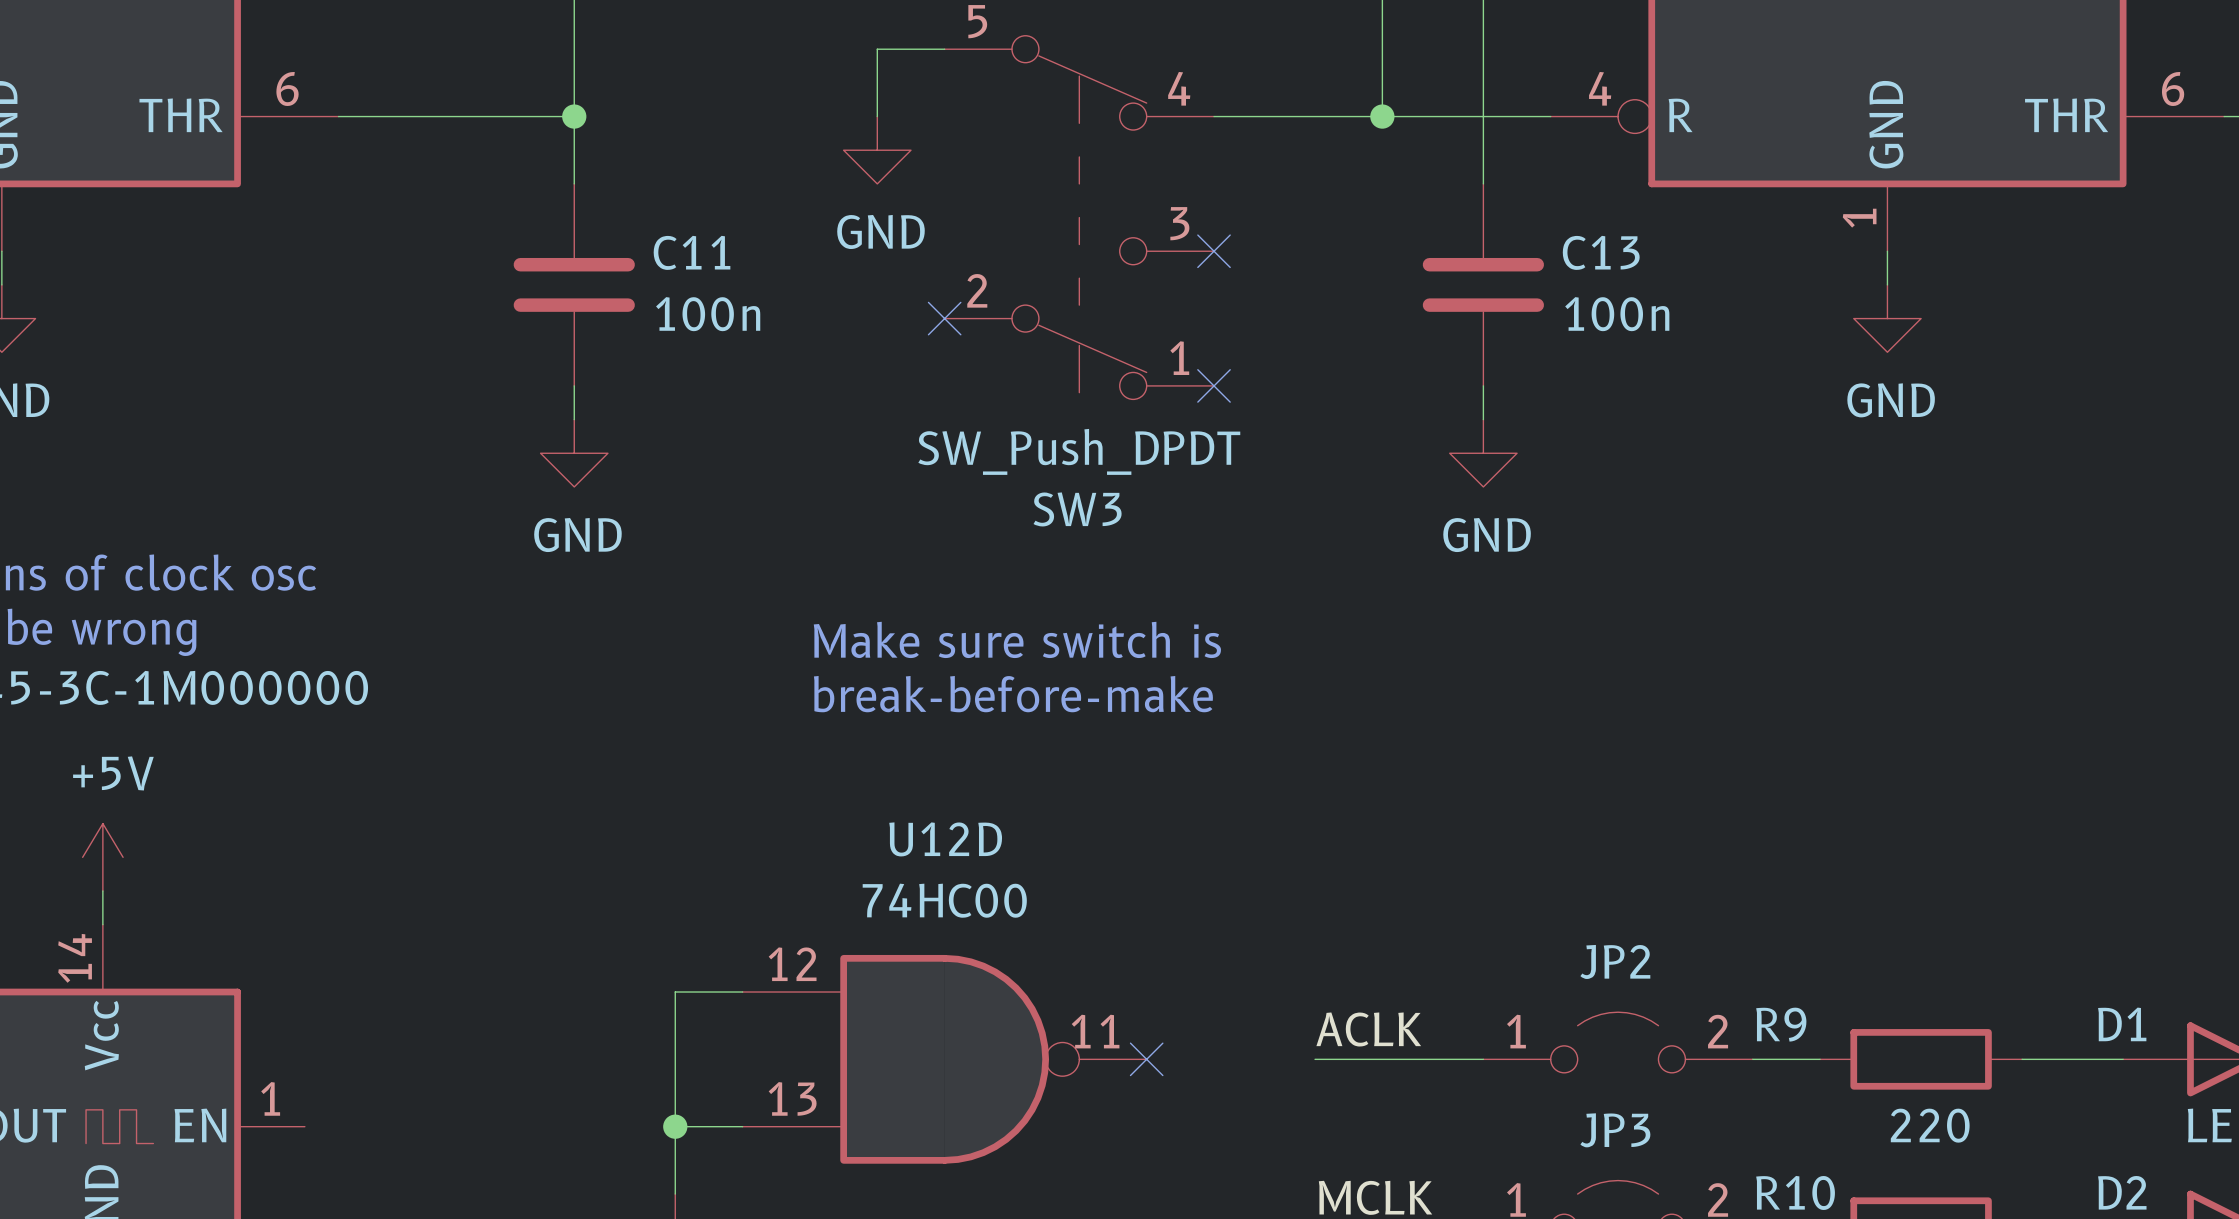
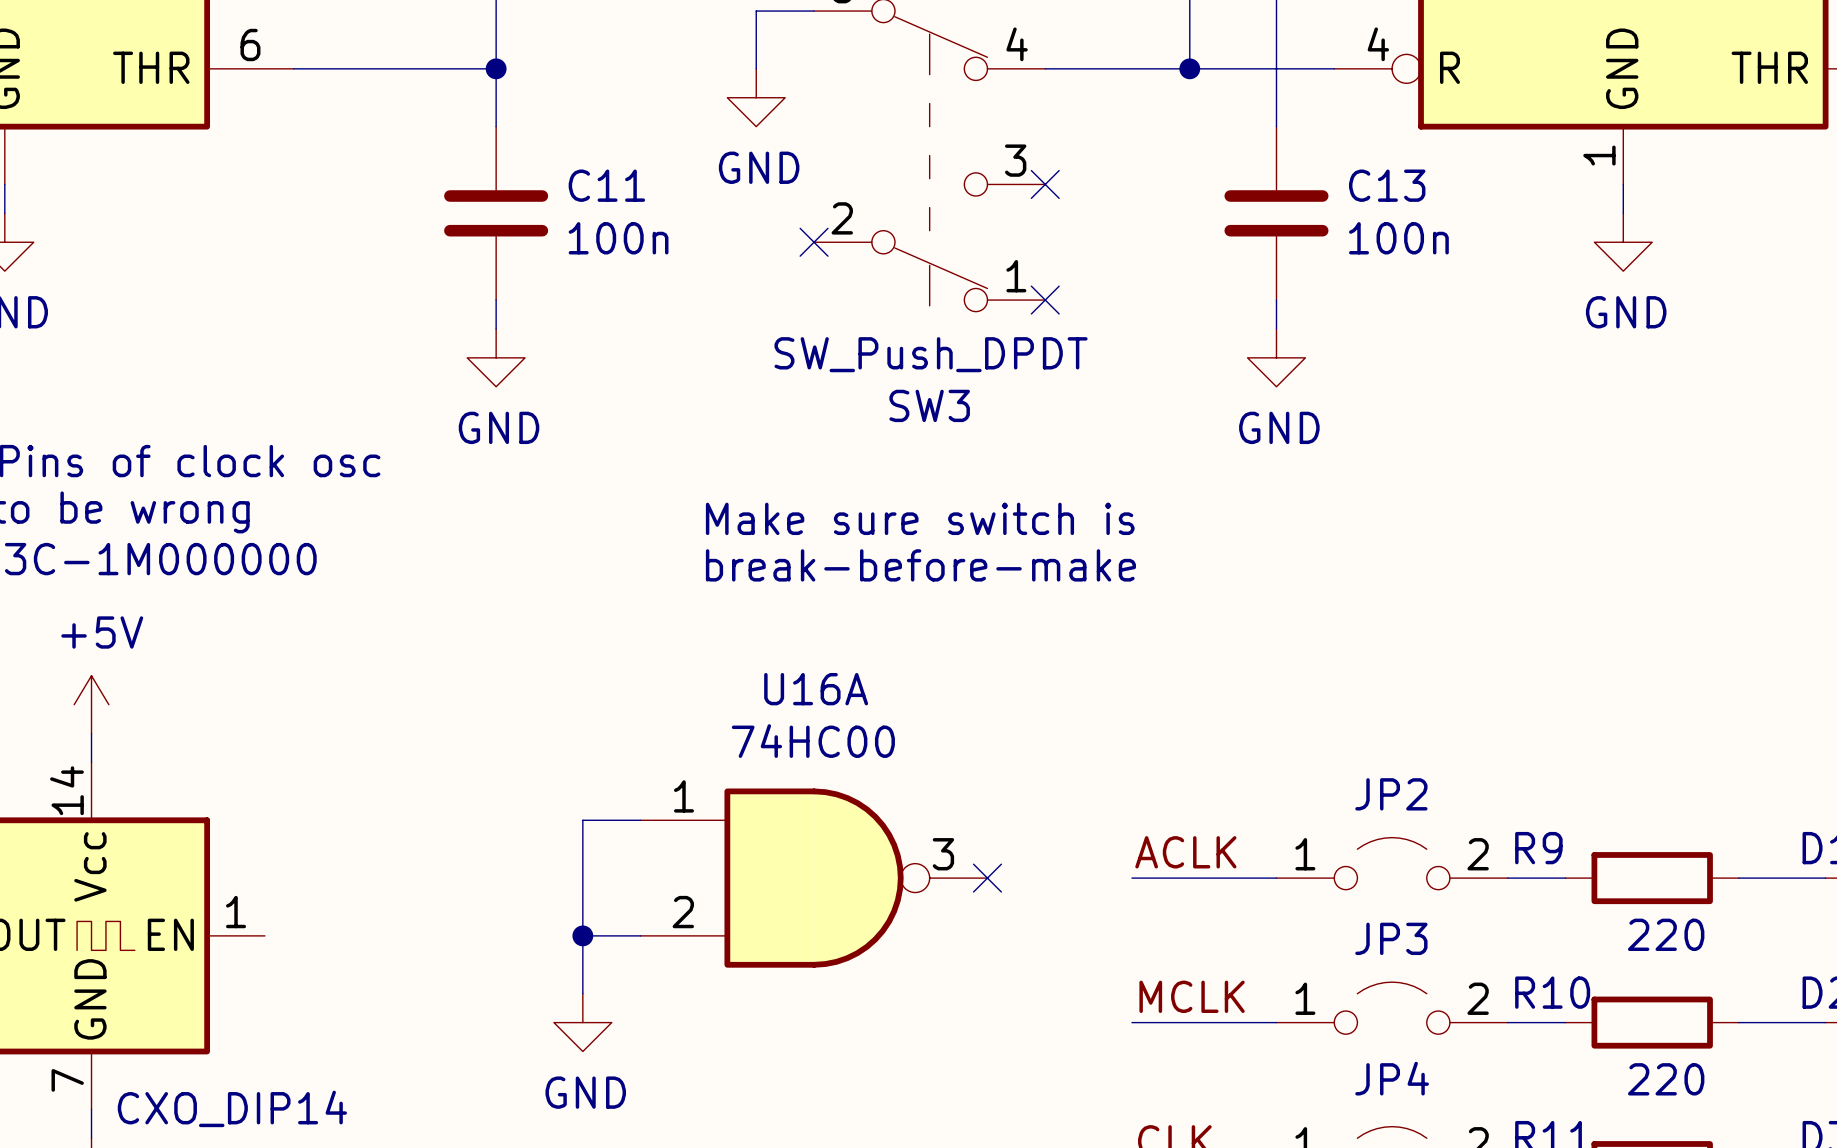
U12D name: U12D (945, 839) -> U16A (816, 689)
U12D pin number: 12 (792, 964) -> 1 (684, 796)
U12D pin number: 11 (1095, 1031) -> 3 (943, 854)
U12D pin number: 13 (792, 1098) -> 2 (683, 912)

